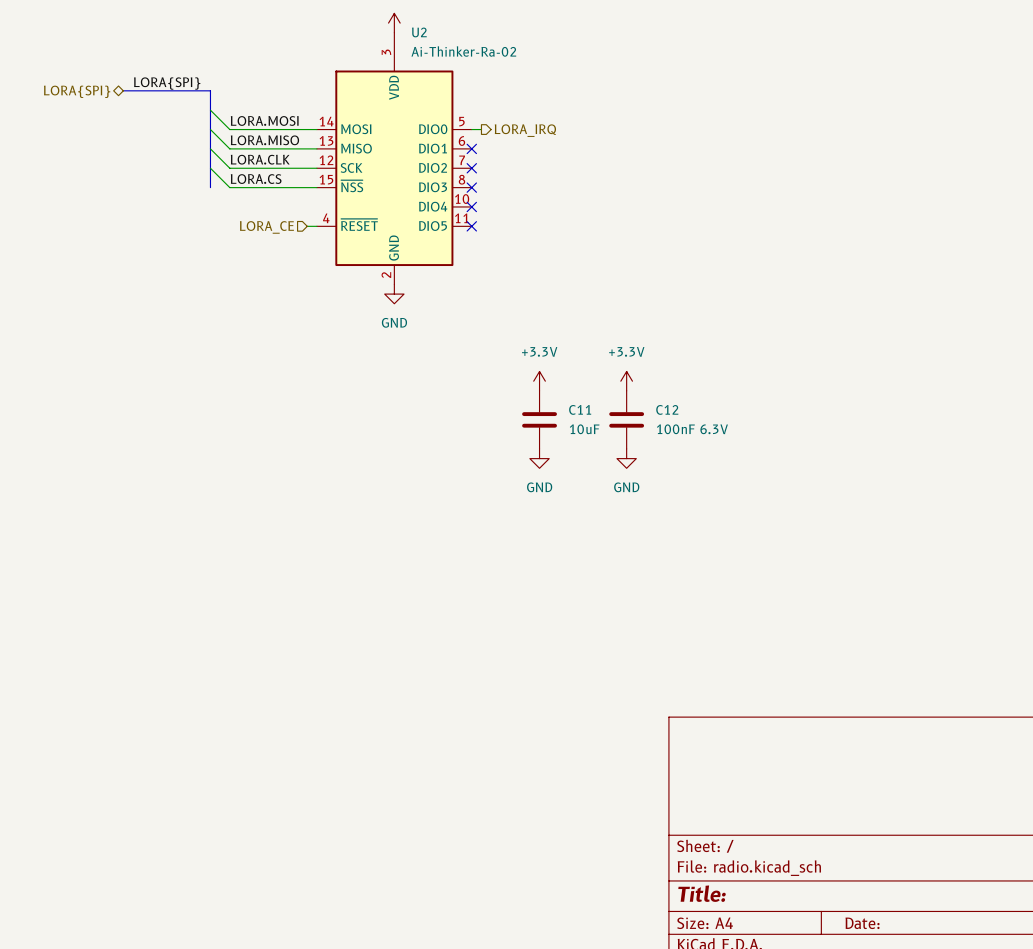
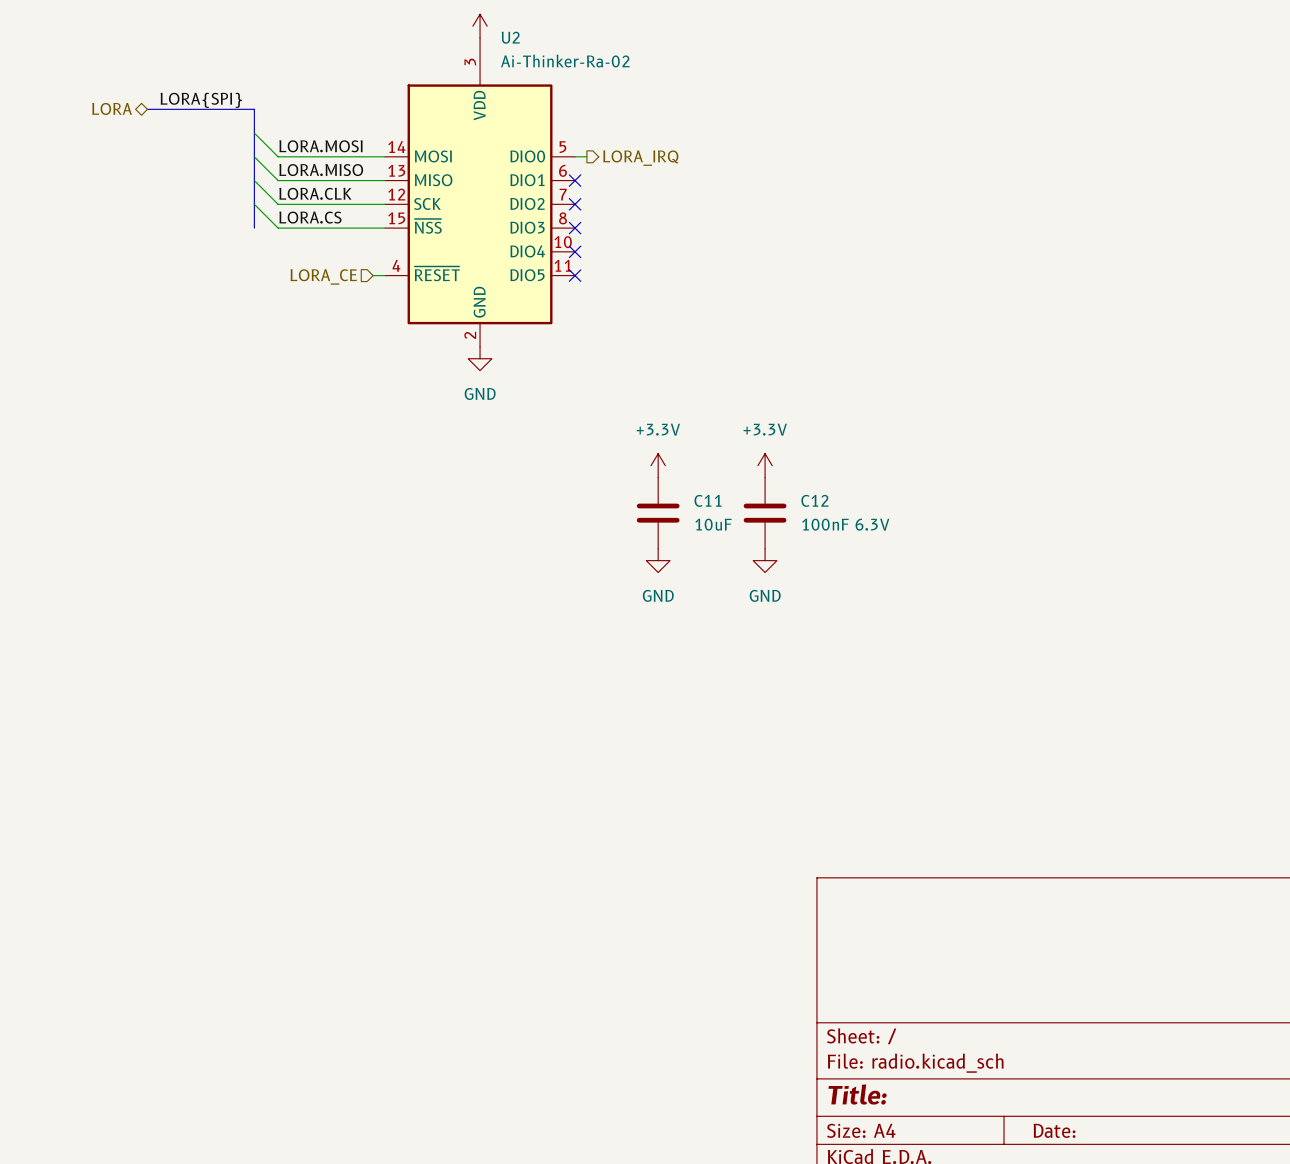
hierarchical label: LORA{SPI} (77, 91) -> LORA (112, 108)

